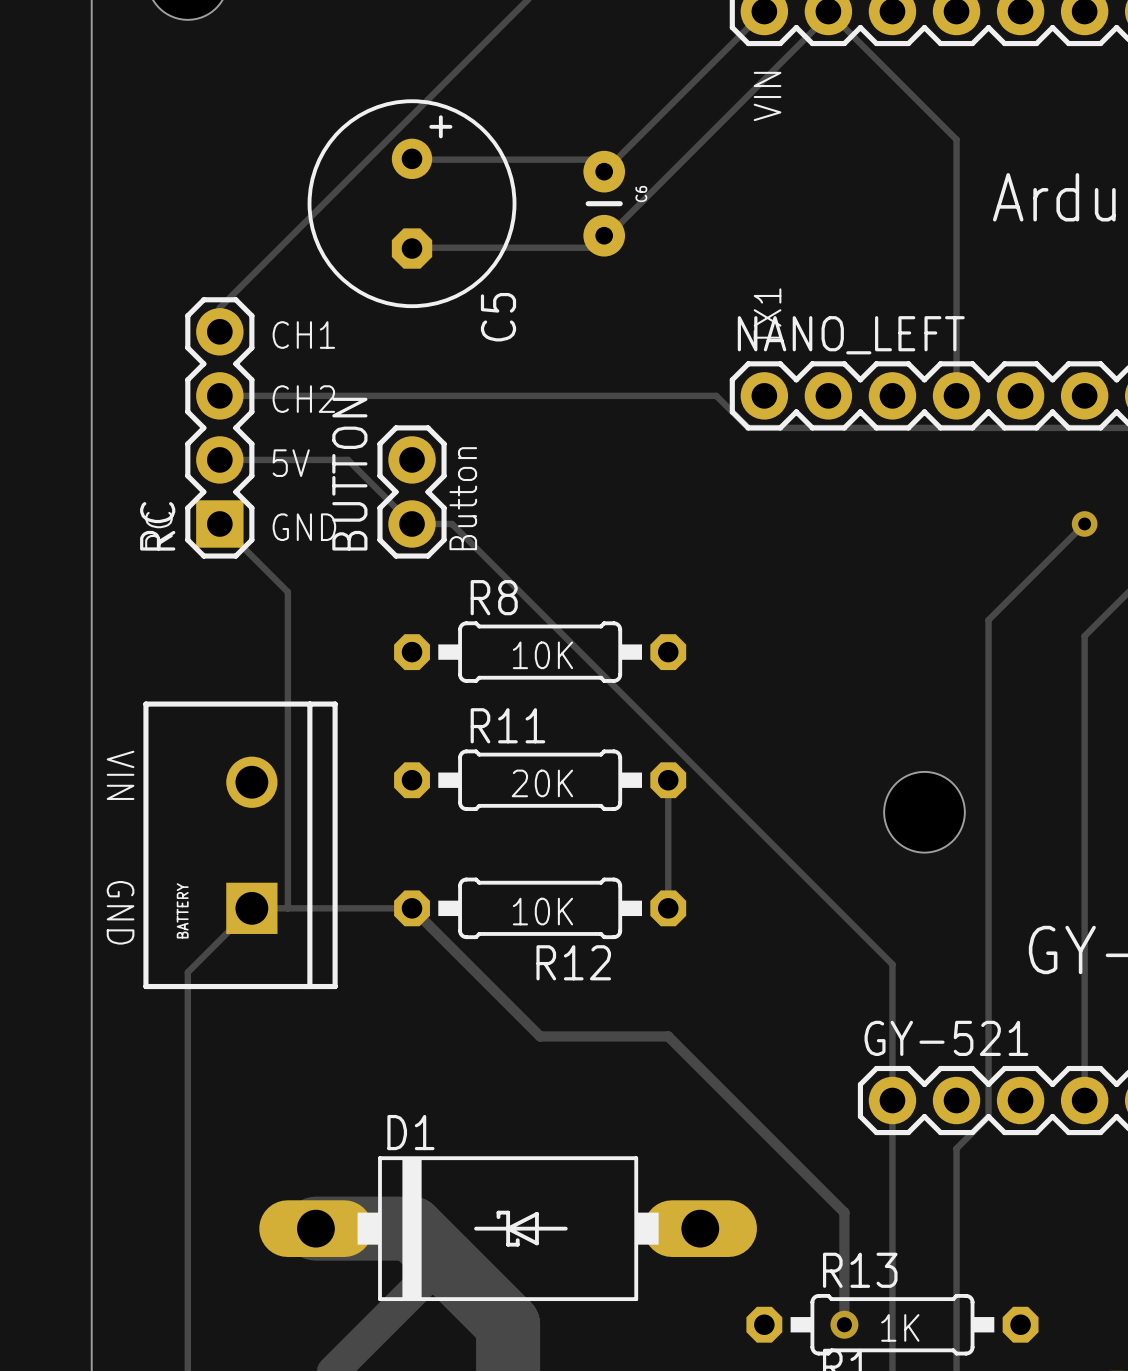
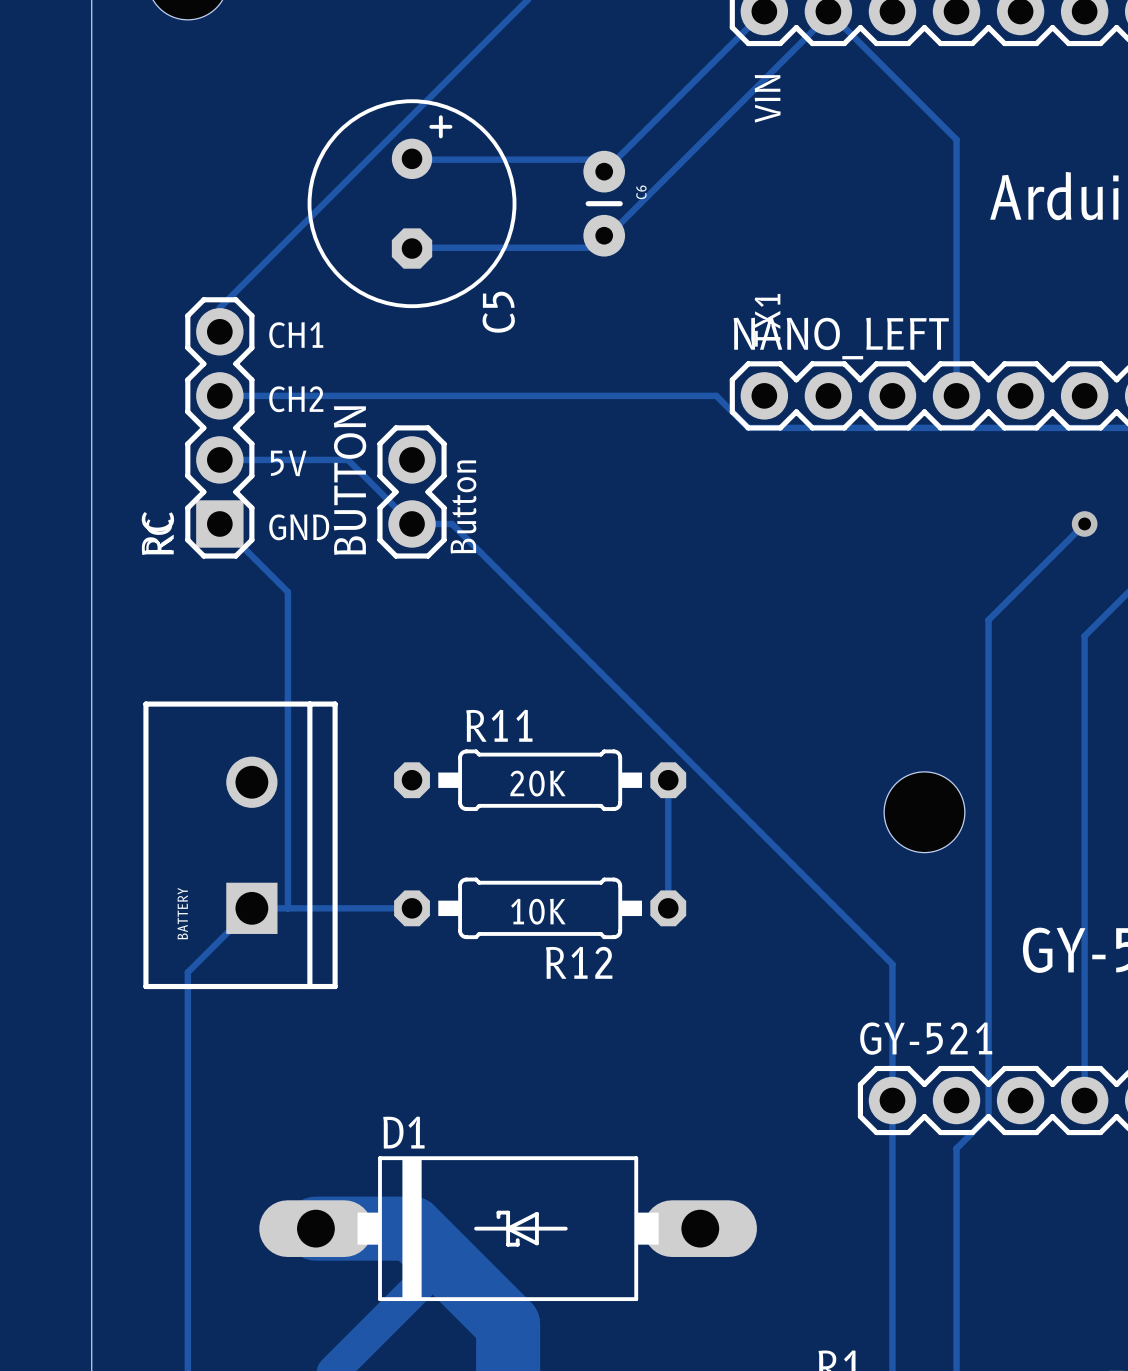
R8: (540, 652) -> none
text: 10K (542, 655) -> none
text: VIN (120, 775) -> none
track: (412, 908) (540, 1036) (668, 1036) (844, 1212) (844, 1324) -> none
text: GND (120, 912) -> none
via: (844, 1324) -> none
R13: (892, 1324) -> none
text: 1K (900, 1327) -> none

